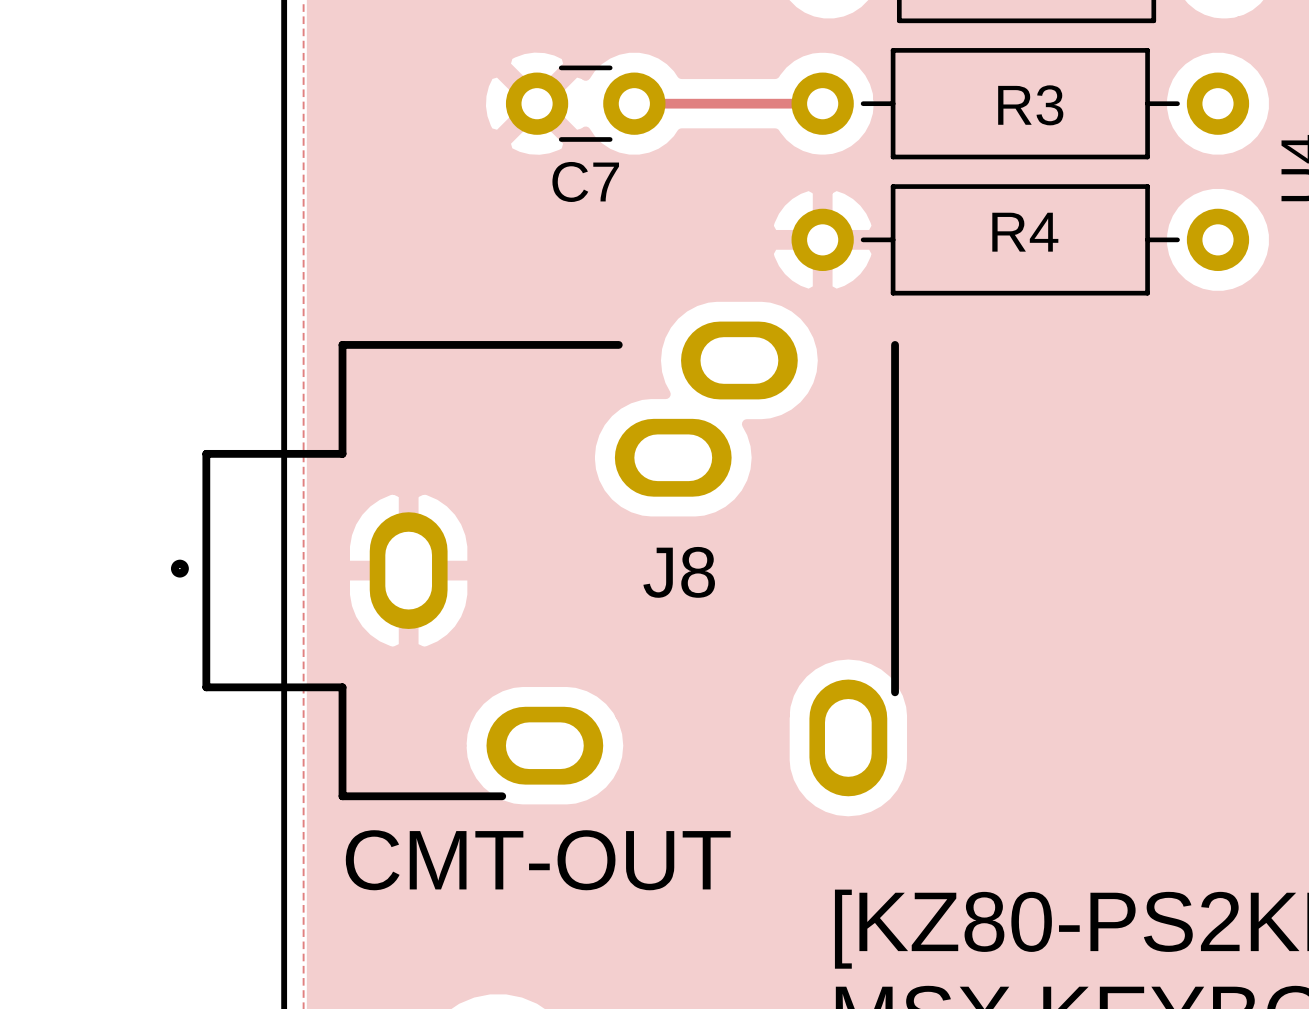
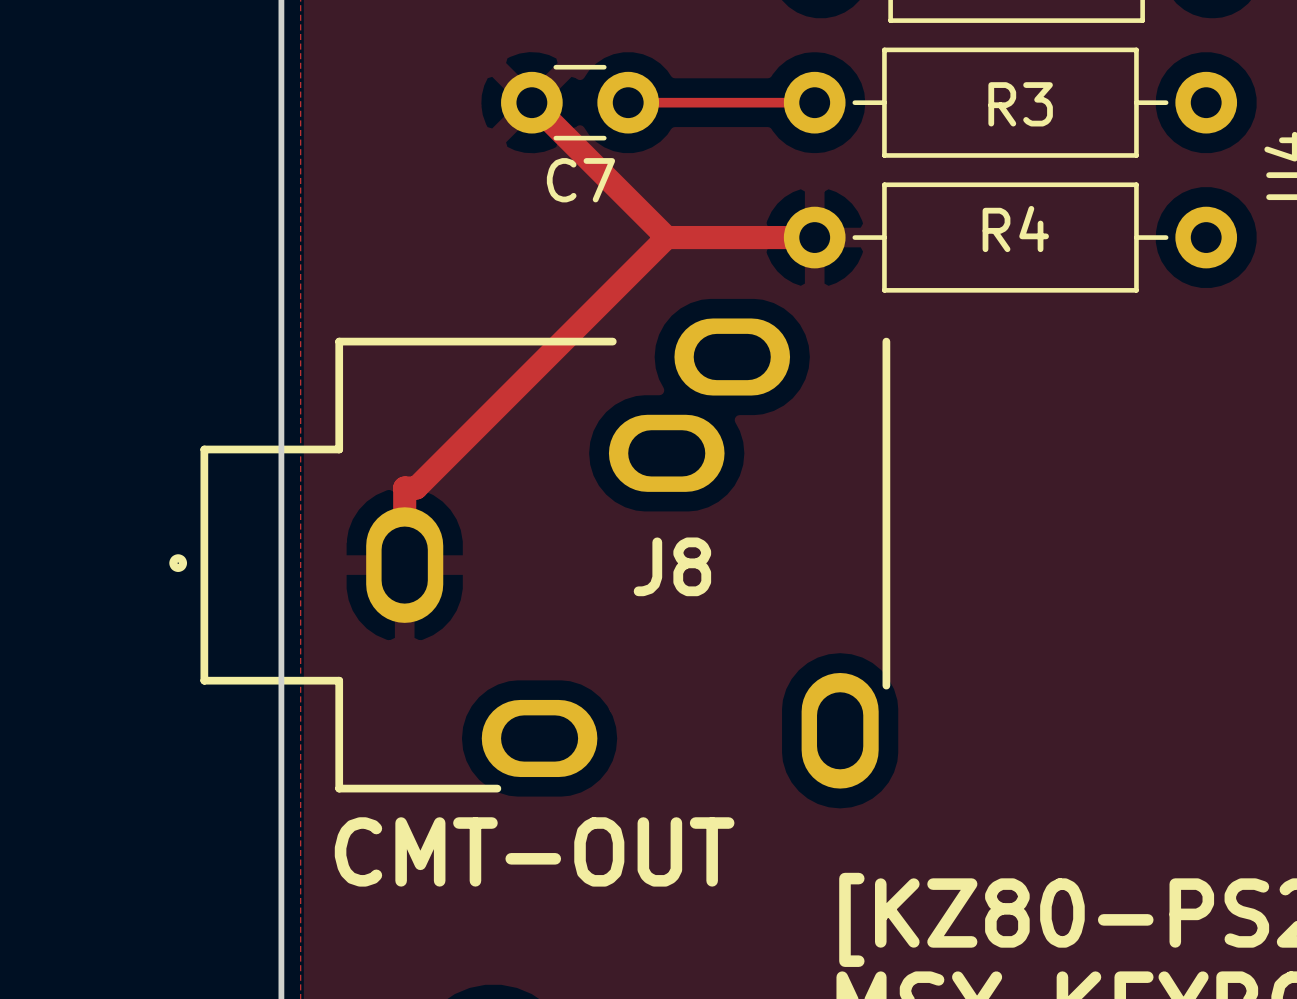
track: none -> (531, 102) (666, 237)
track: none -> (666, 237) (814, 237)
track: none -> (666, 237) (416, 488) (404, 488) (404, 565)

